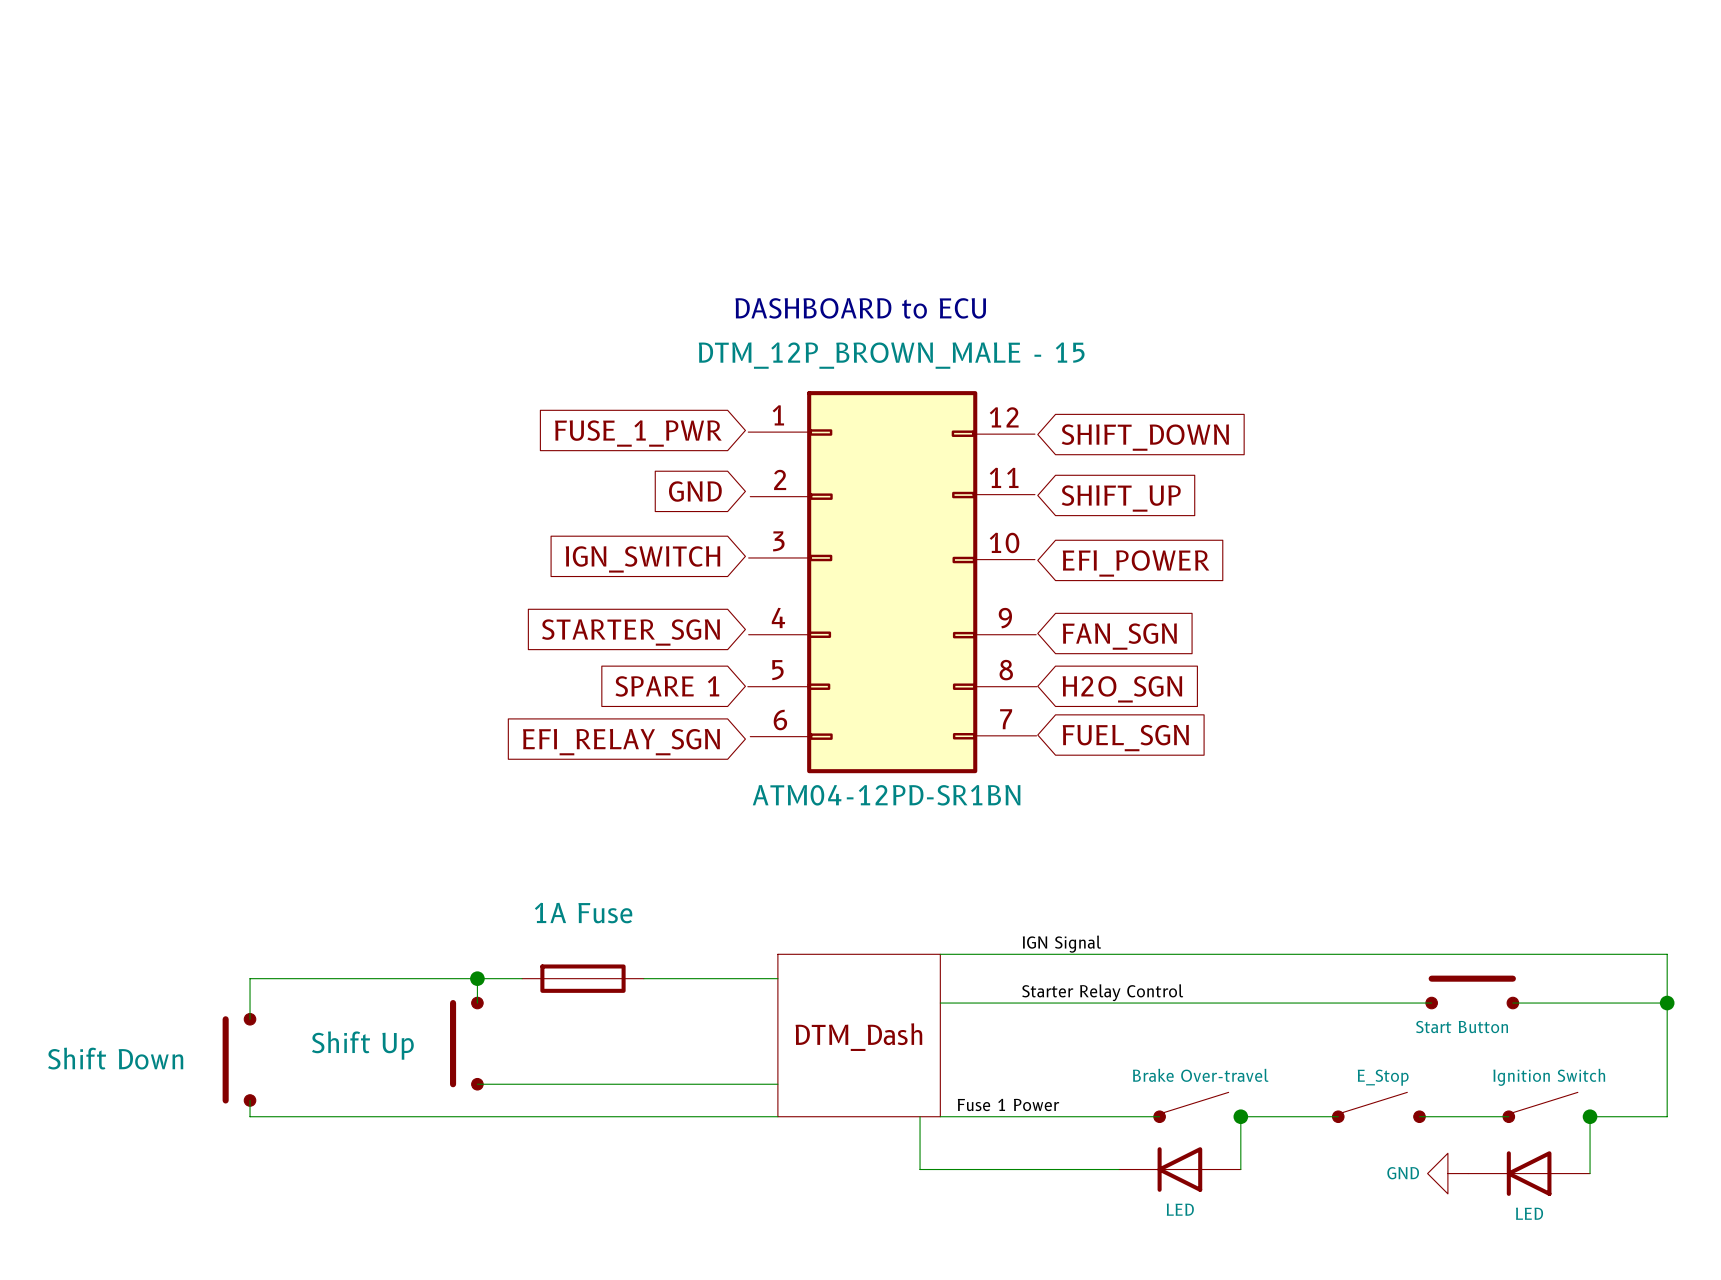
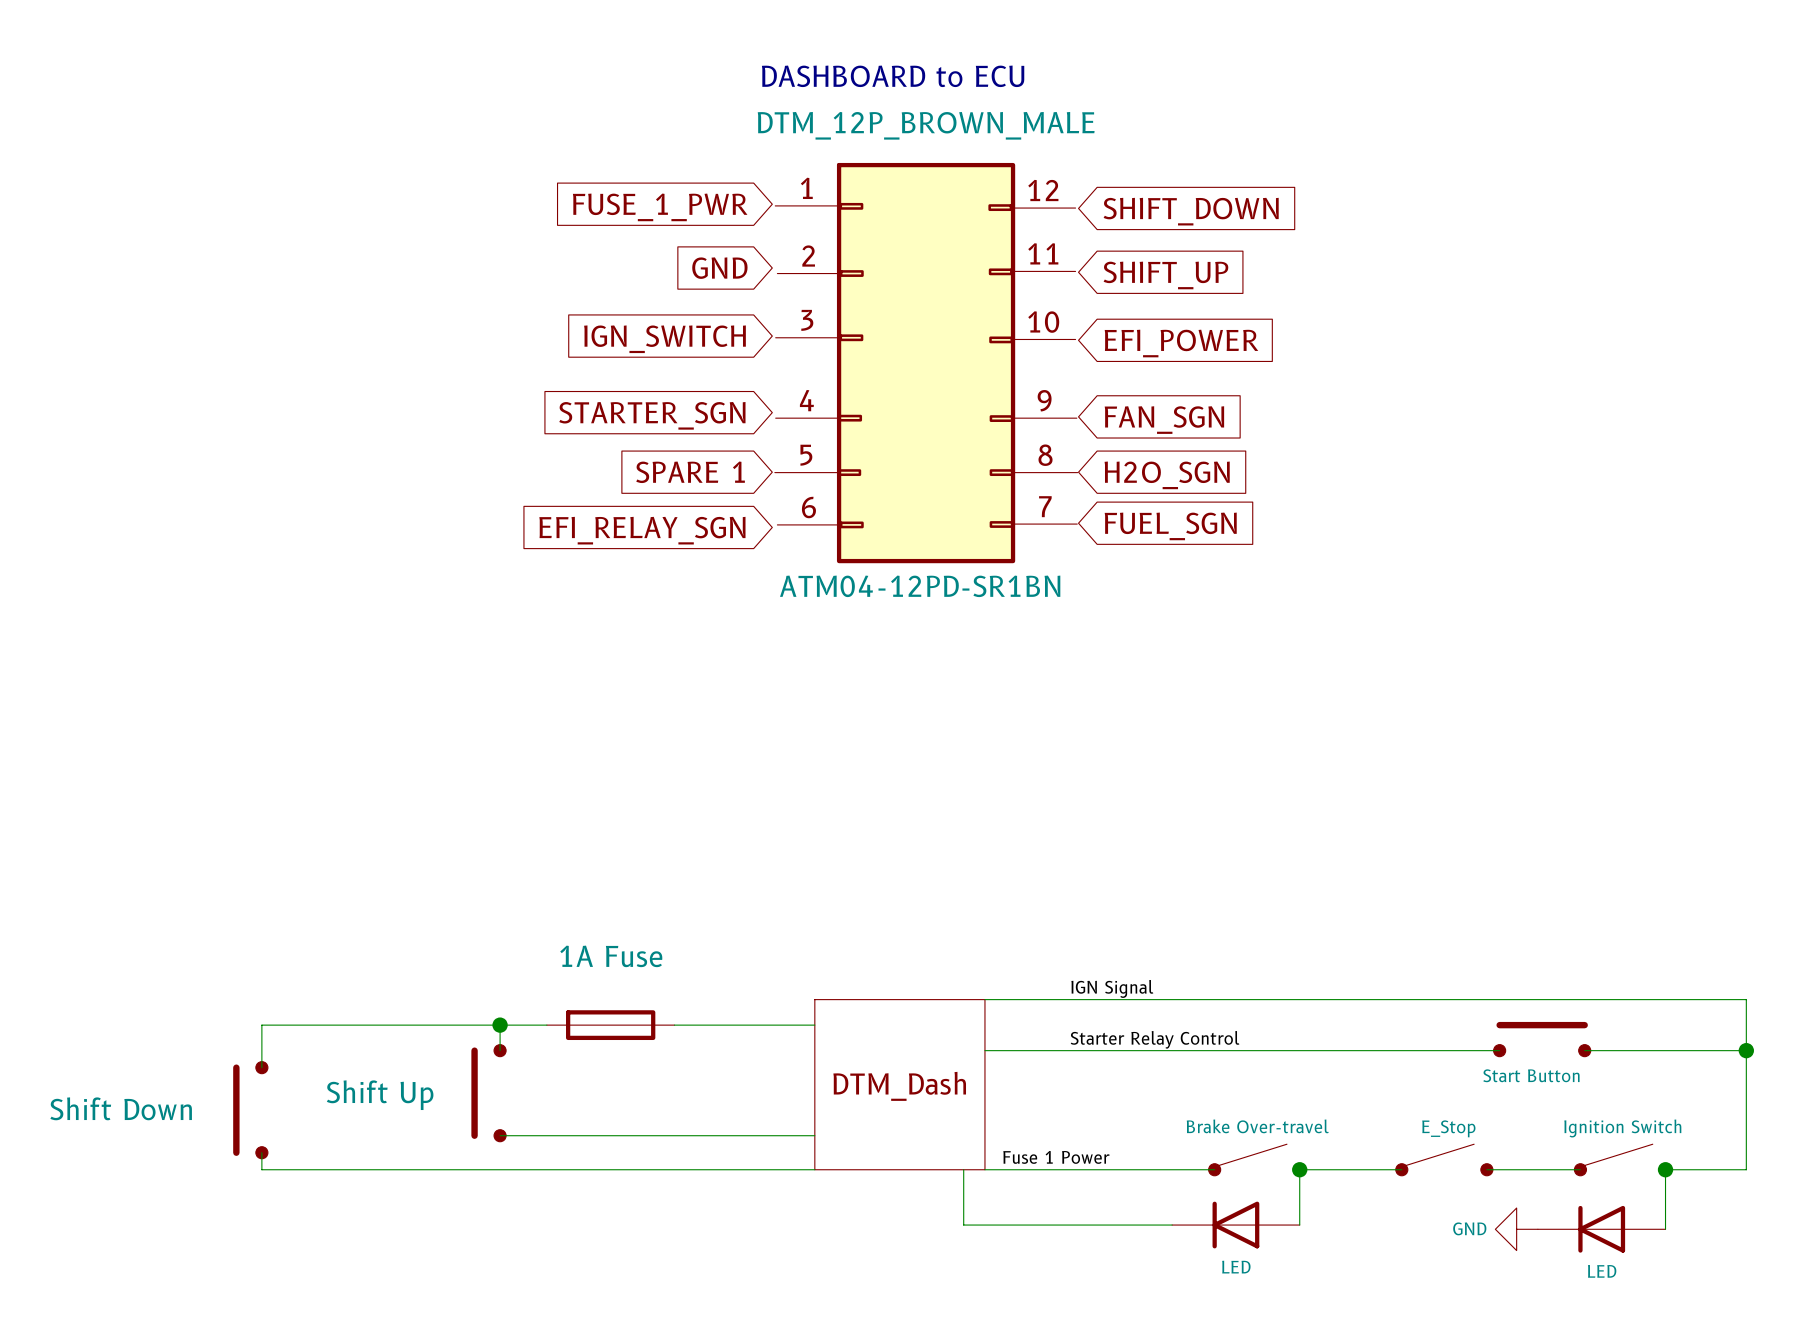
text position: DASHBOARD to ECU (860, 308) -> DASHBOARD to ECU (893, 76)
part: none -> DTM_12P_BROWN_MALE (926, 363)
global label position: FUSE_1_PWR (638, 433) -> FUSE_1_PWR (660, 207)
global label position: SHIFT_DOWN (1145, 437) -> SHIFT_DOWN (1191, 211)
global label position: GND (695, 491) -> GND (719, 268)
global label position: SHIFT_UP (1121, 498) -> SHIFT_UP (1165, 275)
global label position: IGN_SWITCH (642, 559) -> IGN_SWITCH (664, 339)
global label position: EFI_POWER (1136, 563) -> EFI_POWER (1181, 343)
part: DTM_12P_BROWN_MALE - 15 (892, 582) -> none
global label position: STARTER_SGN (630, 632) -> STARTER_SGN (652, 415)
global label position: FAN_SGN (1119, 636) -> FAN_SGN (1164, 420)
global label position: SPARE 1 (667, 686) -> SPARE 1 (690, 472)
global label position: H2O_SGN (1122, 689) -> H2O_SGN (1167, 475)
global label position: FUEL_SGN (1125, 738) -> FUEL_SGN (1170, 526)
global label position: EFI_RELAY_SGN (621, 742) -> EFI_RELAY_SGN (642, 530)

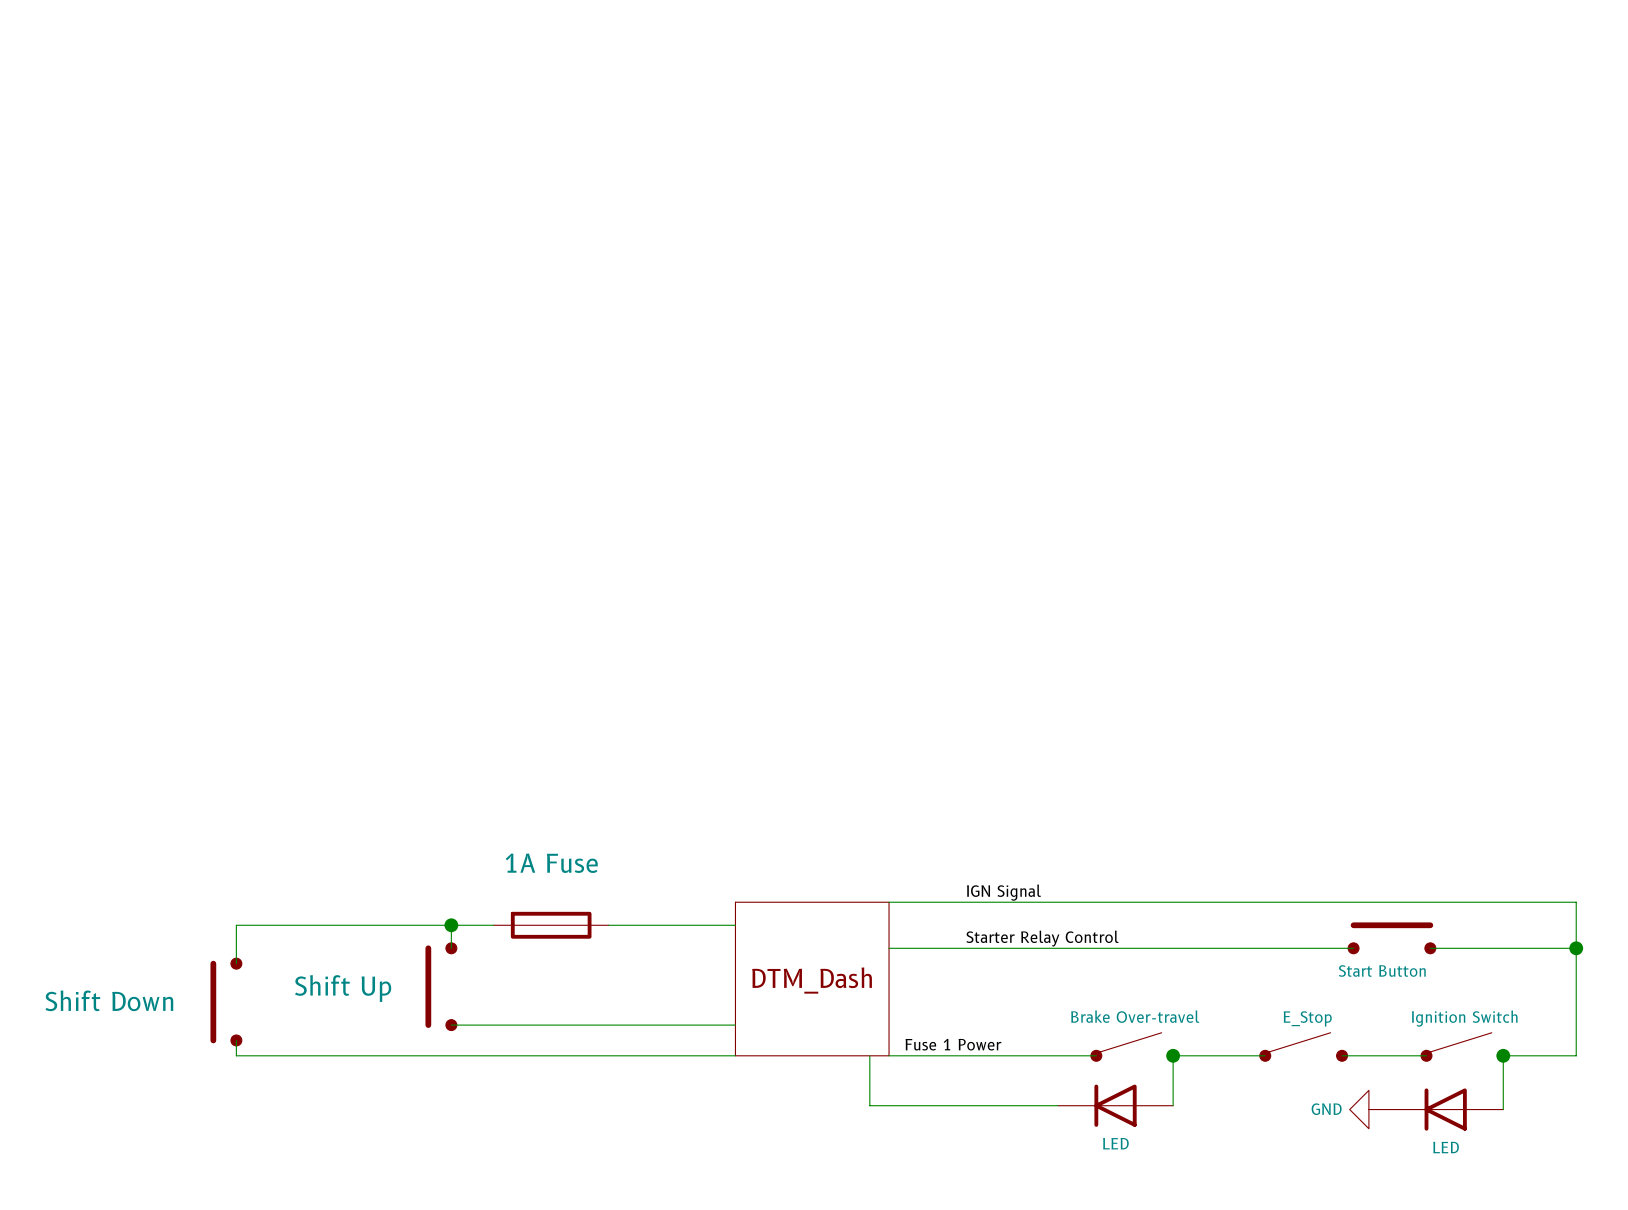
text: DASHBOARD to ECU (893, 76) -> none
global label: FUSE_1_PWR (660, 207) -> none
global label: SHIFT_DOWN (1191, 211) -> none
global label: GND (719, 268) -> none
global label: SHIFT_UP (1165, 275) -> none
global label: IGN_SWITCH (664, 339) -> none
global label: EFI_POWER (1181, 343) -> none
part: DTM_12P_BROWN_MALE (926, 363) -> none
global label: STARTER_SGN (652, 415) -> none
global label: FAN_SGN (1164, 420) -> none
global label: SPARE 1 (690, 472) -> none
global label: H2O_SGN (1167, 475) -> none
global label: FUEL_SGN (1170, 526) -> none
global label: EFI_RELAY_SGN (642, 530) -> none

